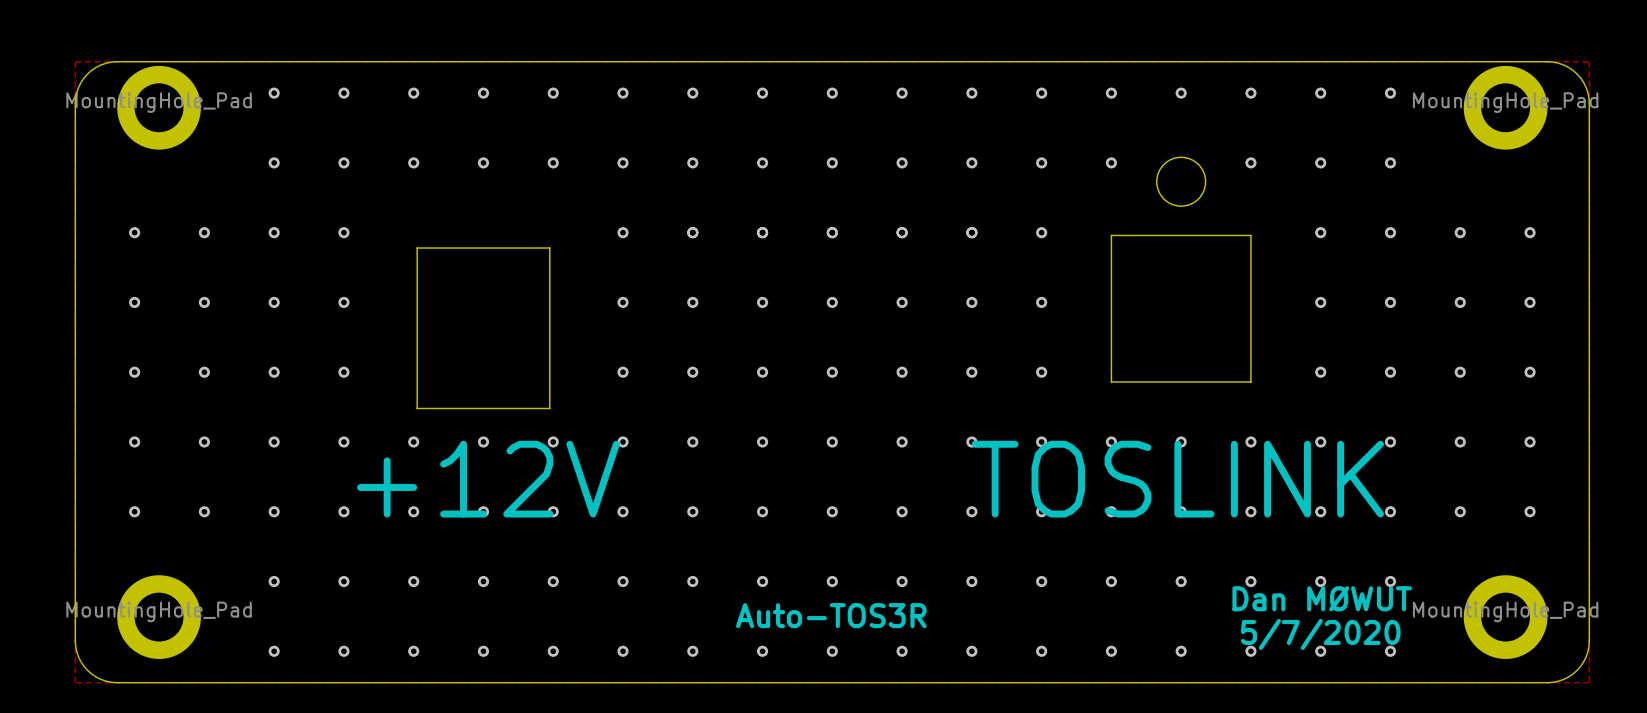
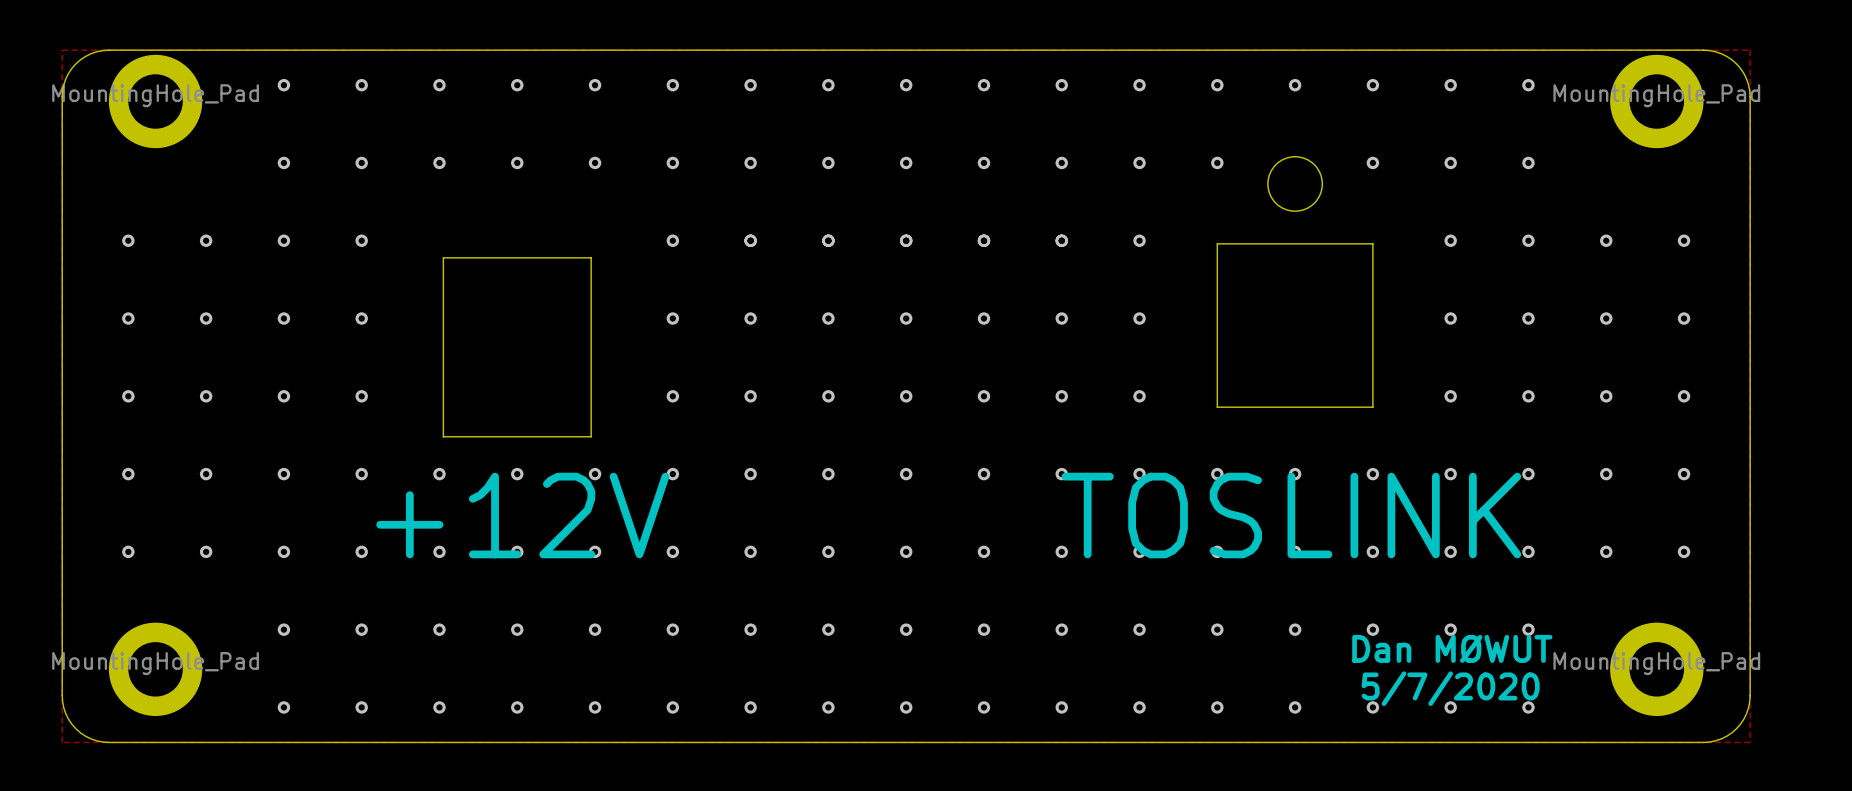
text: Auto-TOS3R (831, 615) -> none

